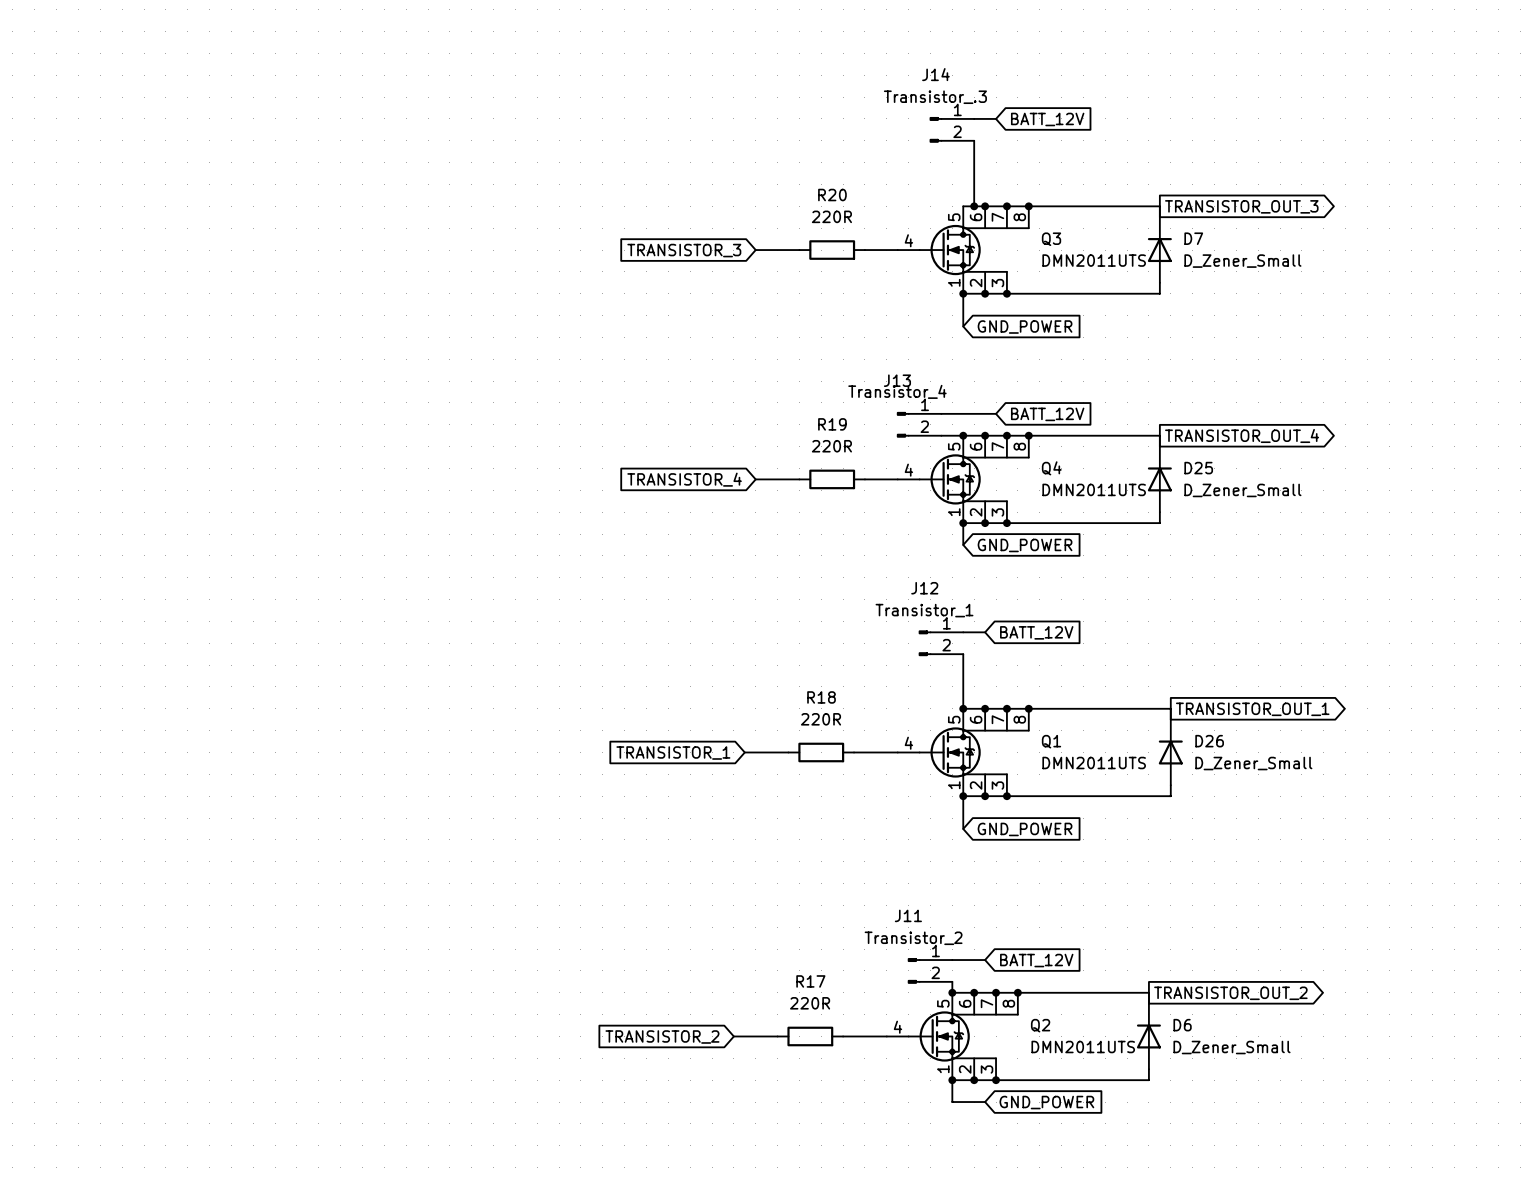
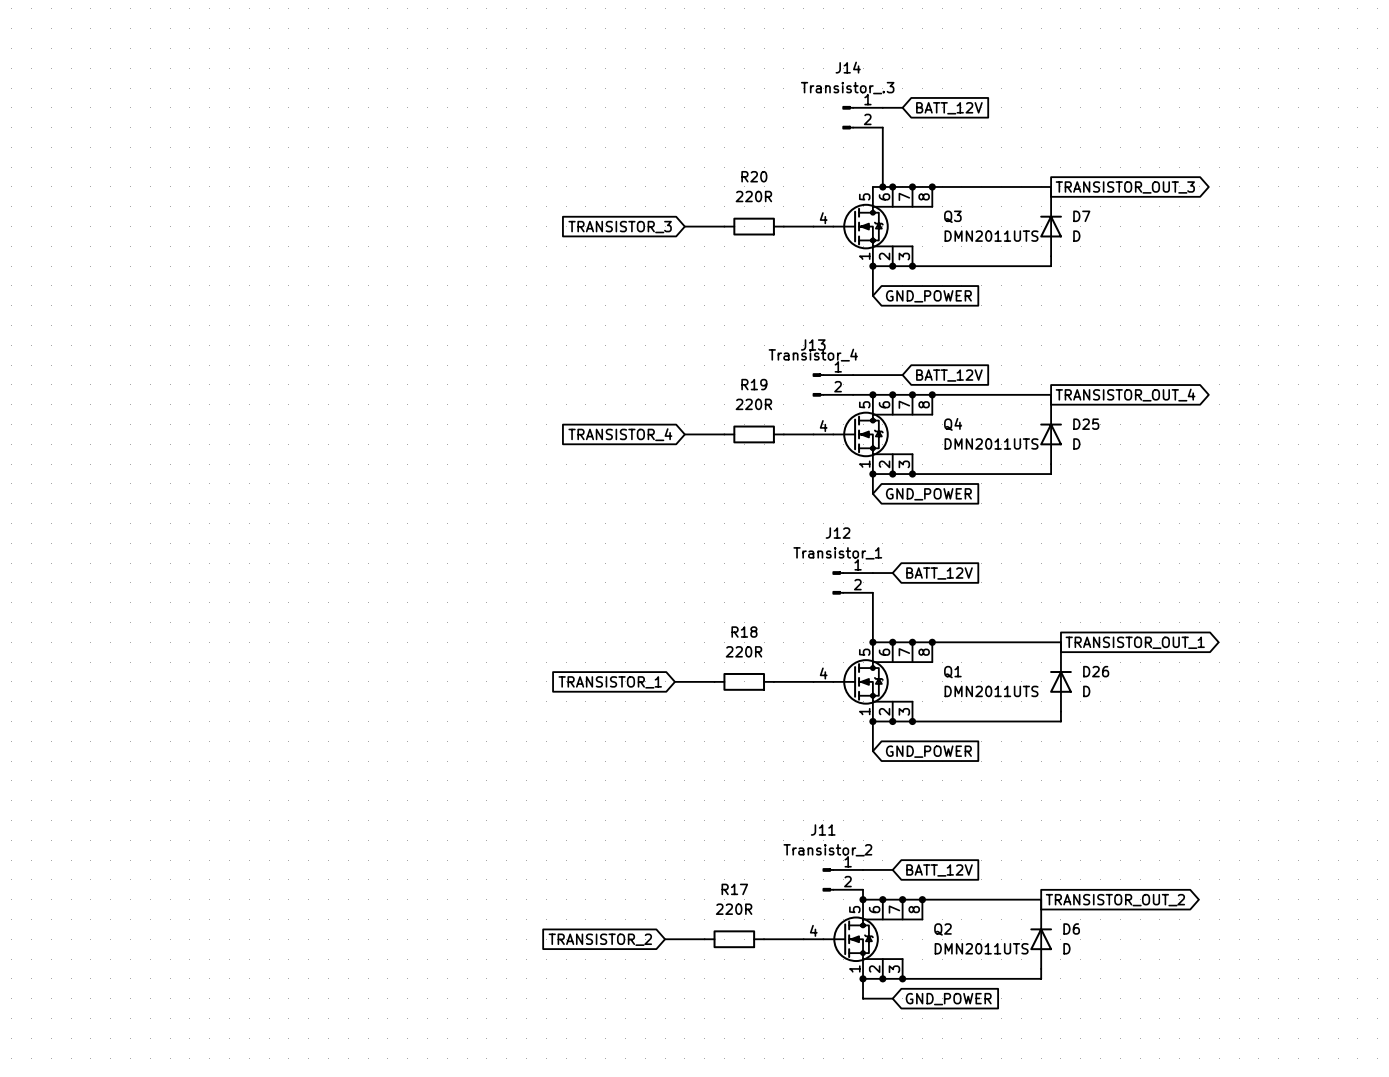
D7 value: D_Zener_Small (1242, 261) -> D (1076, 236)
D25 value: D_Zener_Small (1242, 490) -> D (1076, 443)
D26 value: D_Zener_Small (1253, 763) -> D (1086, 691)
D6 value: D_Zener_Small (1231, 1047) -> D (1066, 948)

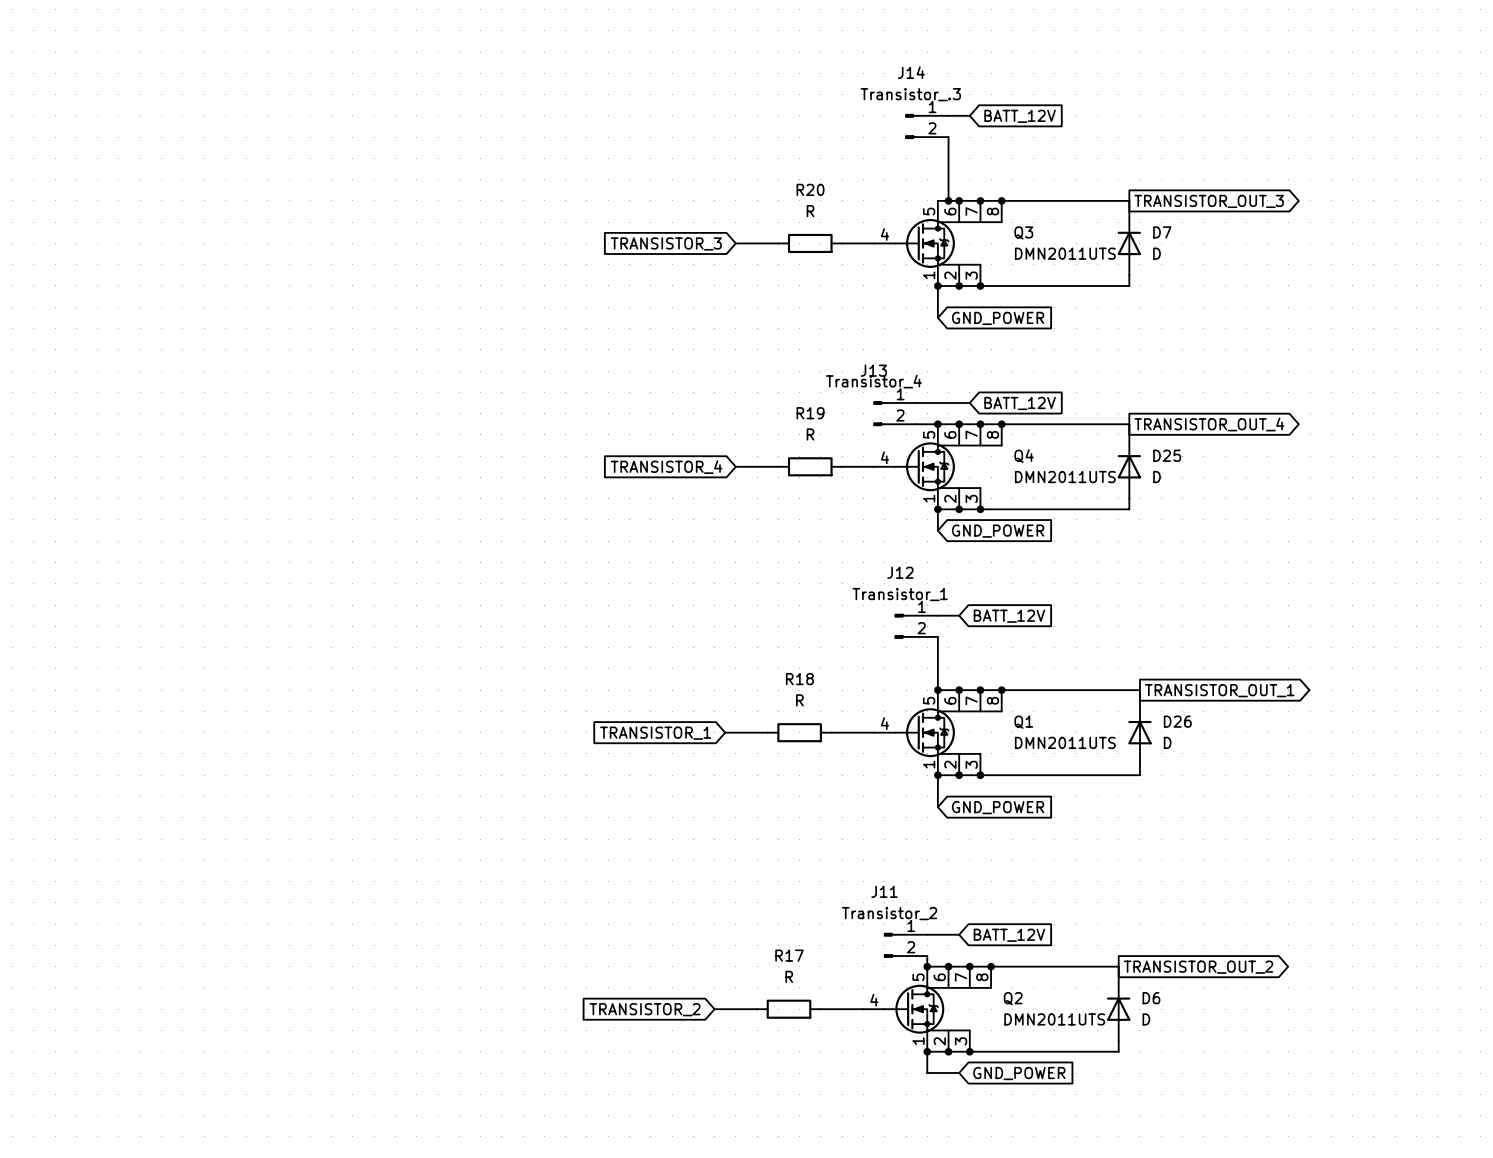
R20 value: 220R (753, 196) -> R (810, 211)
R19 value: 220R (753, 404) -> R (810, 434)
R18 value: 220R (743, 651) -> R (799, 700)
R17 value: 220R (734, 909) -> R (789, 976)

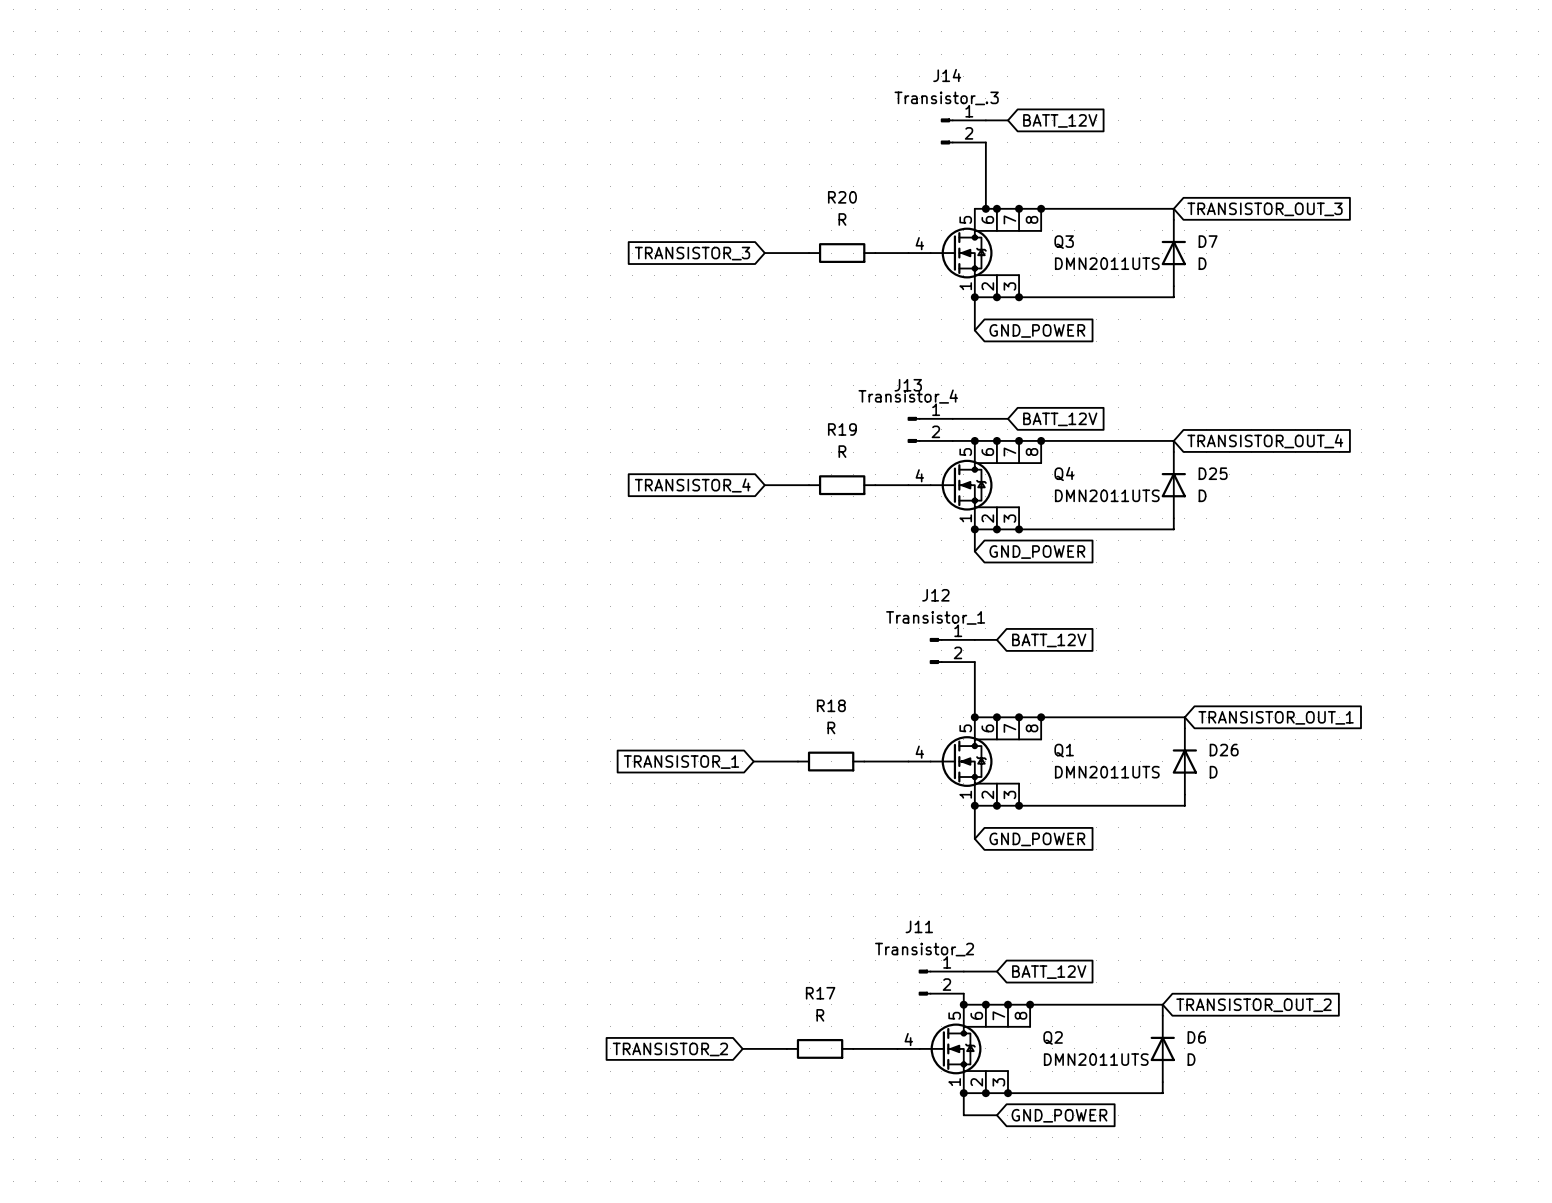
global label shape: output (1209, 201) -> input (1265, 209)
global label shape: output (1209, 424) -> input (1265, 441)
global label shape: output (1219, 690) -> input (1276, 717)
global label shape: output (1198, 967) -> input (1253, 1005)

